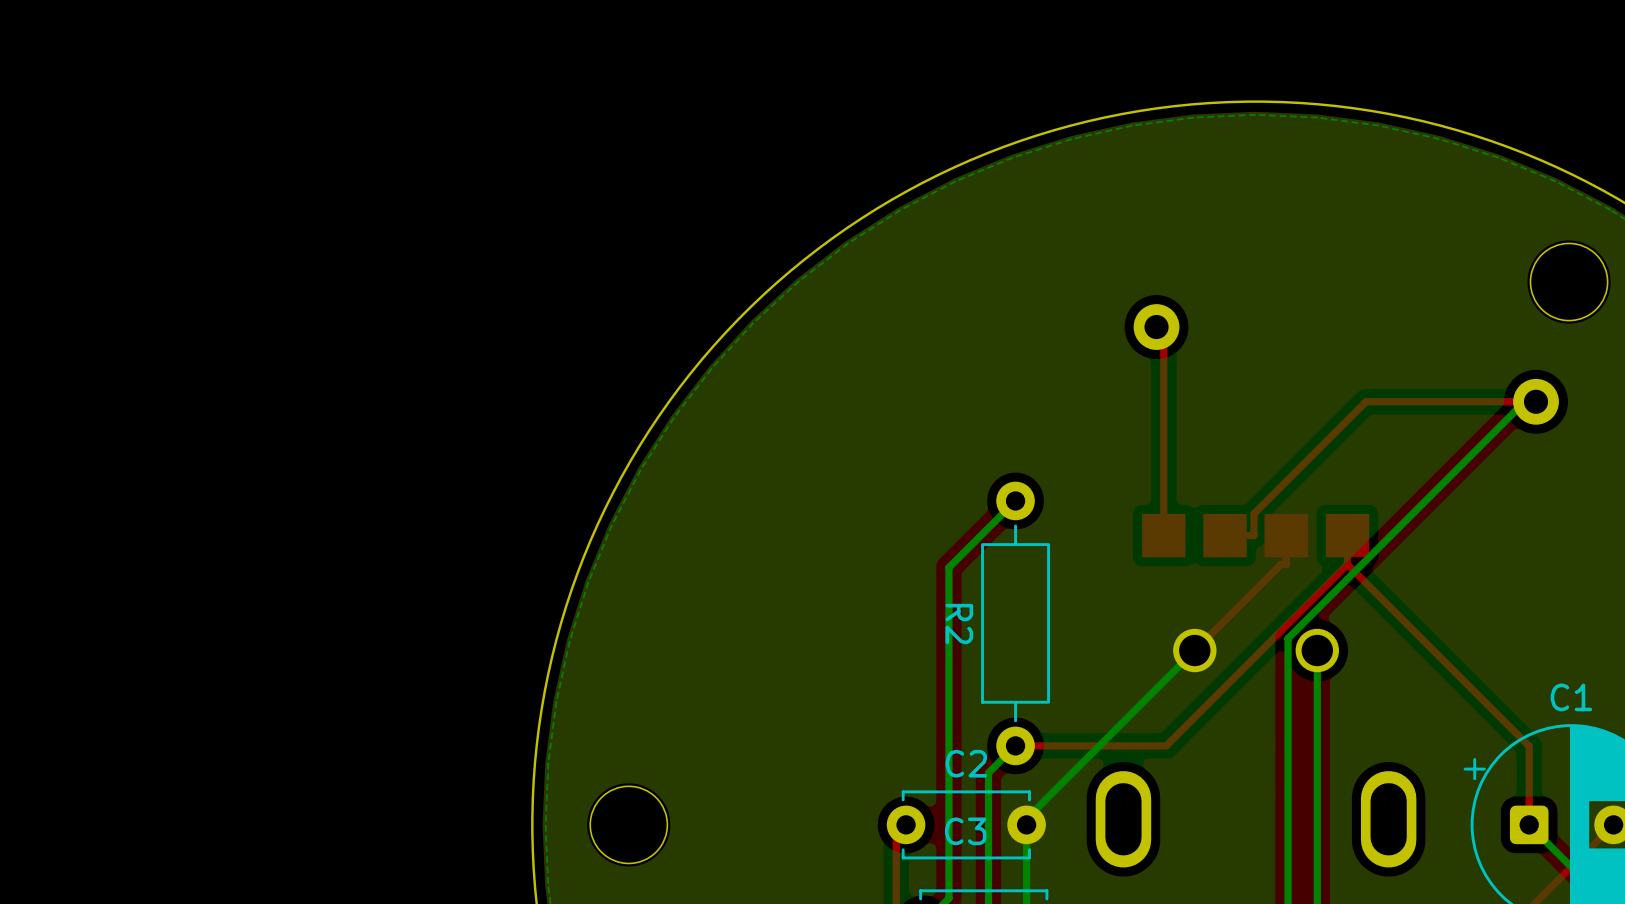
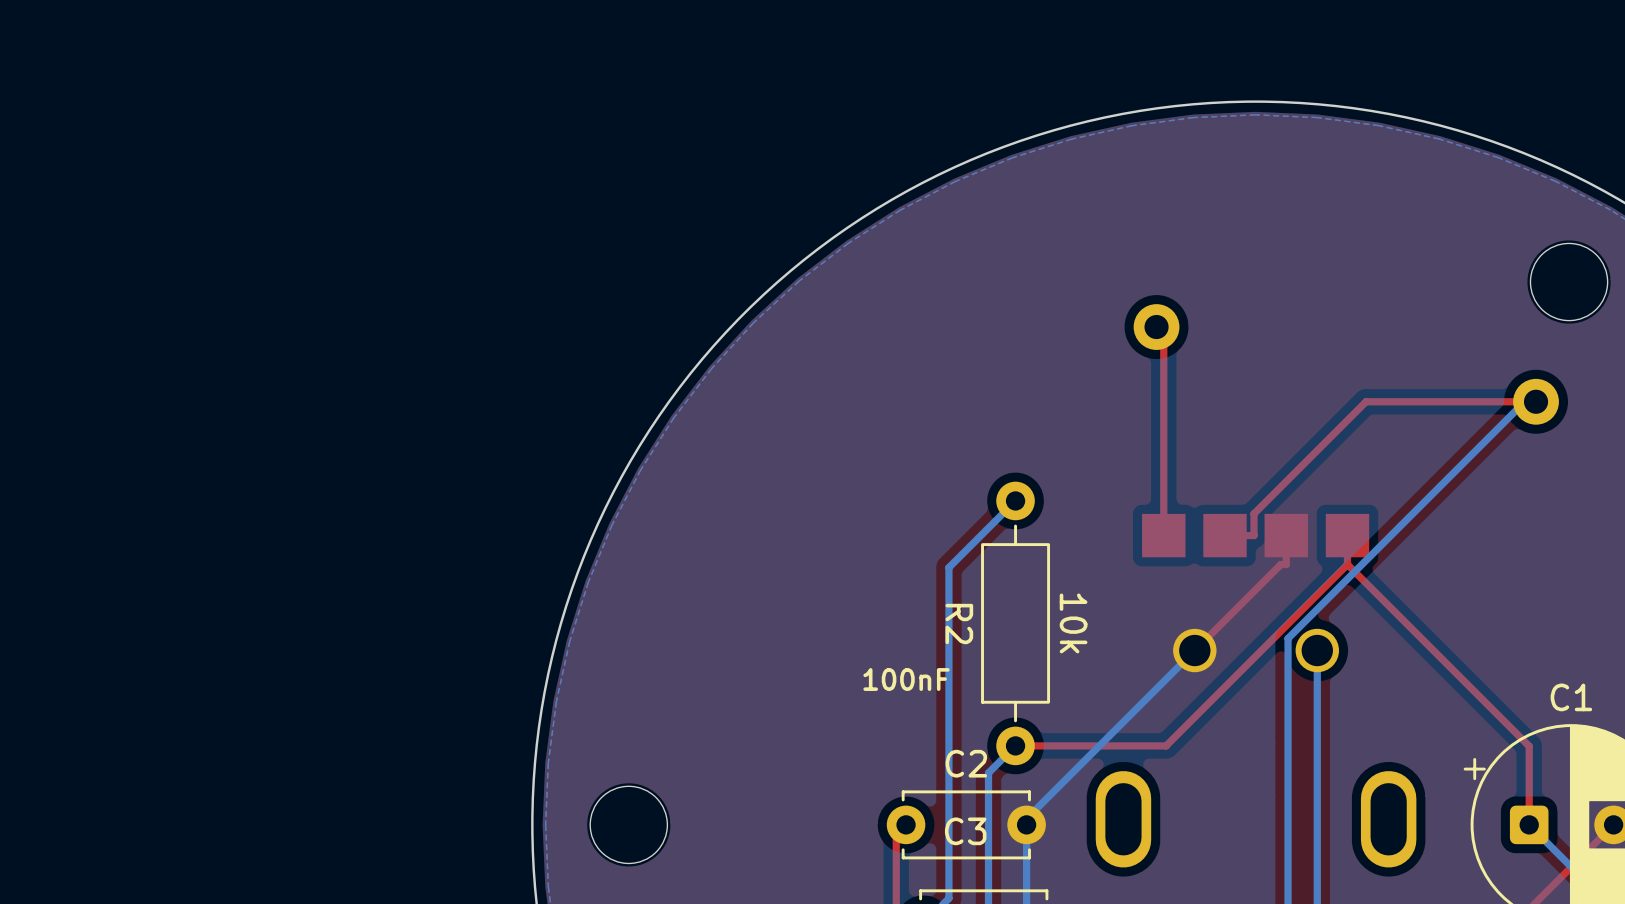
R2 value: none -> 10k (1073, 623)
C2 value: none -> 100nF (906, 679)

